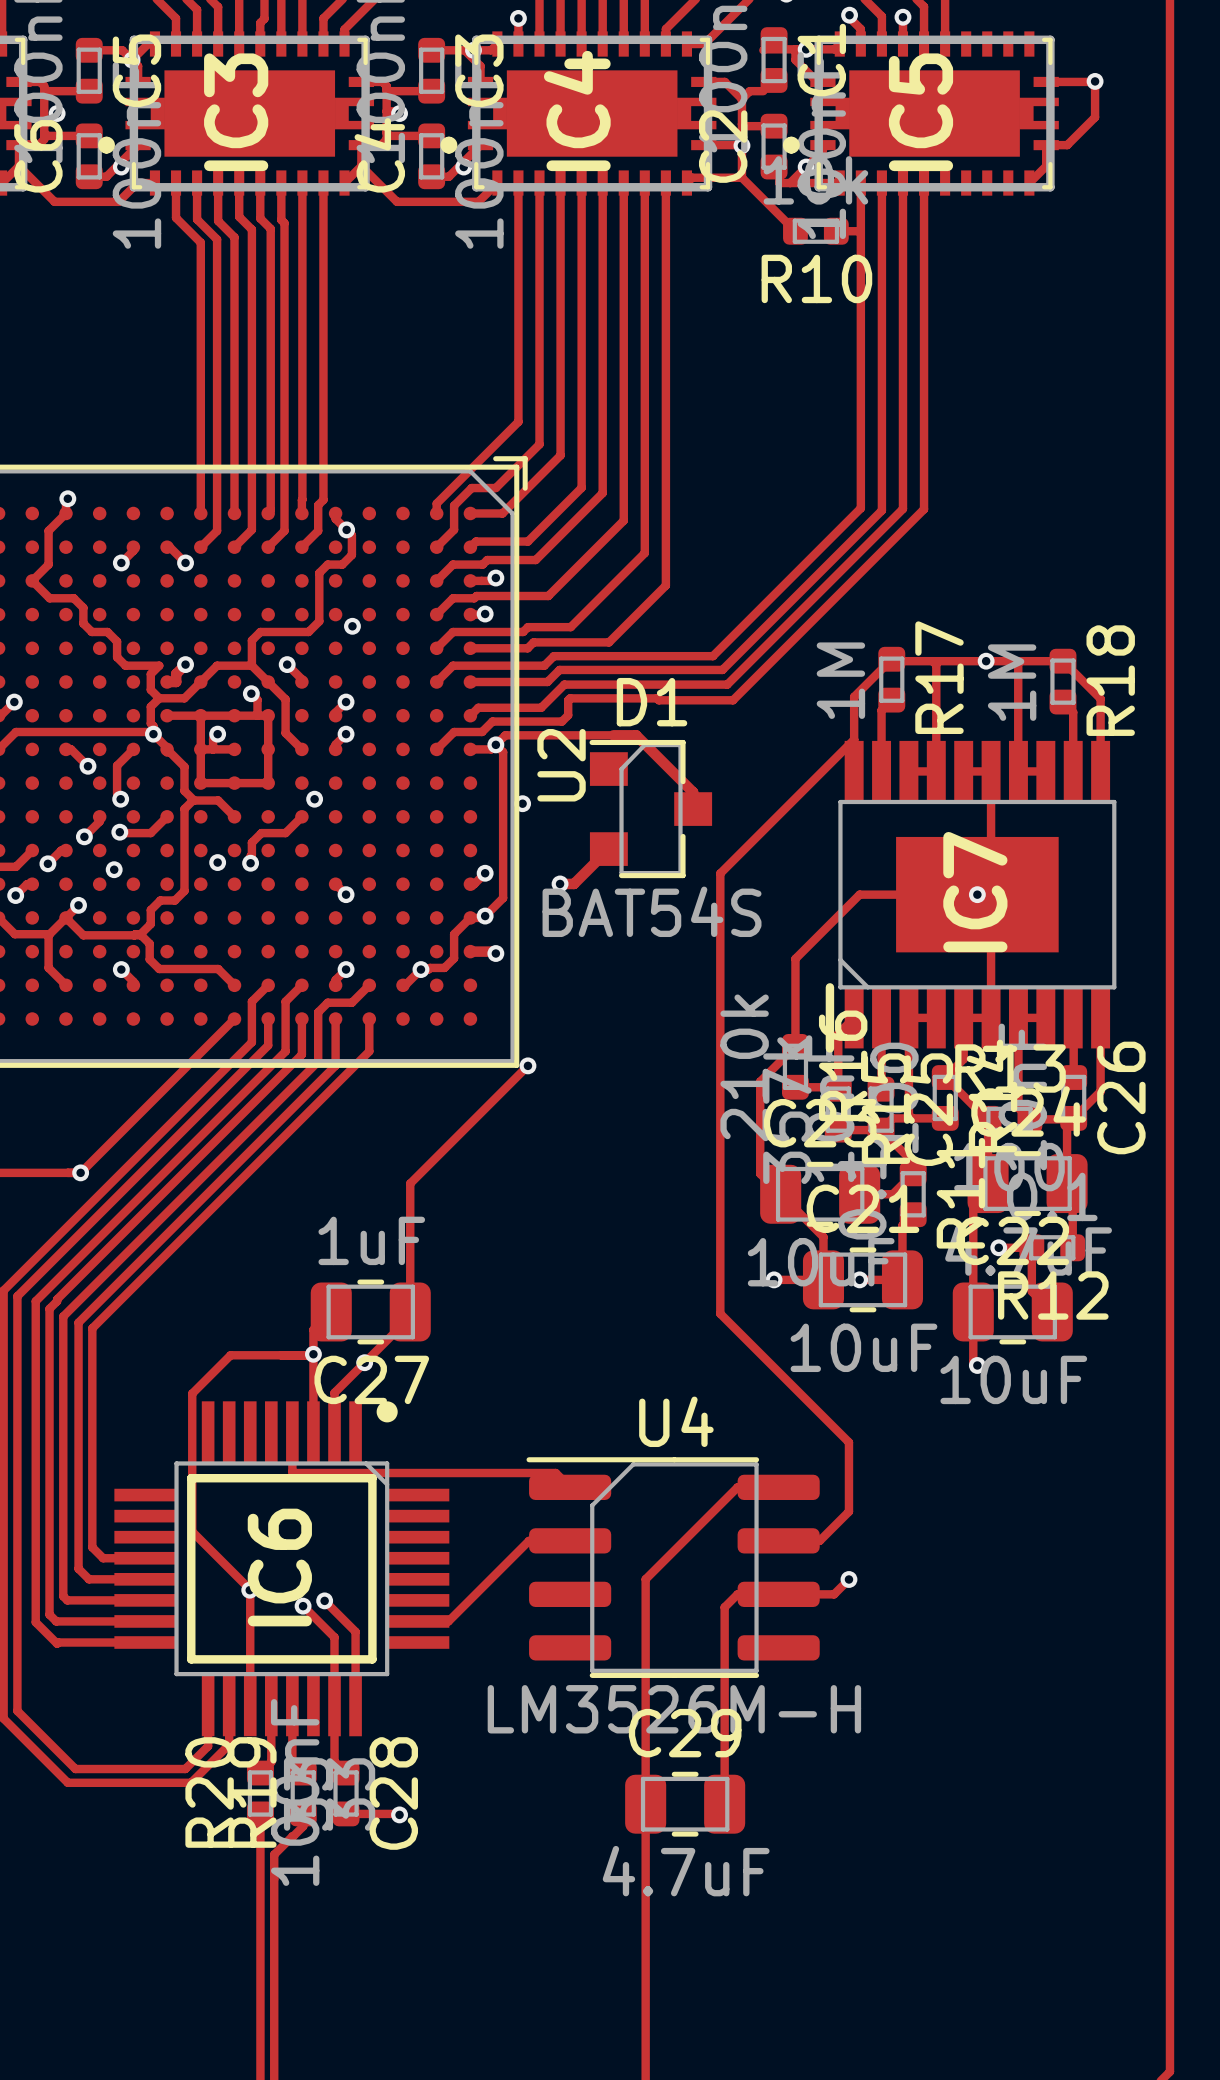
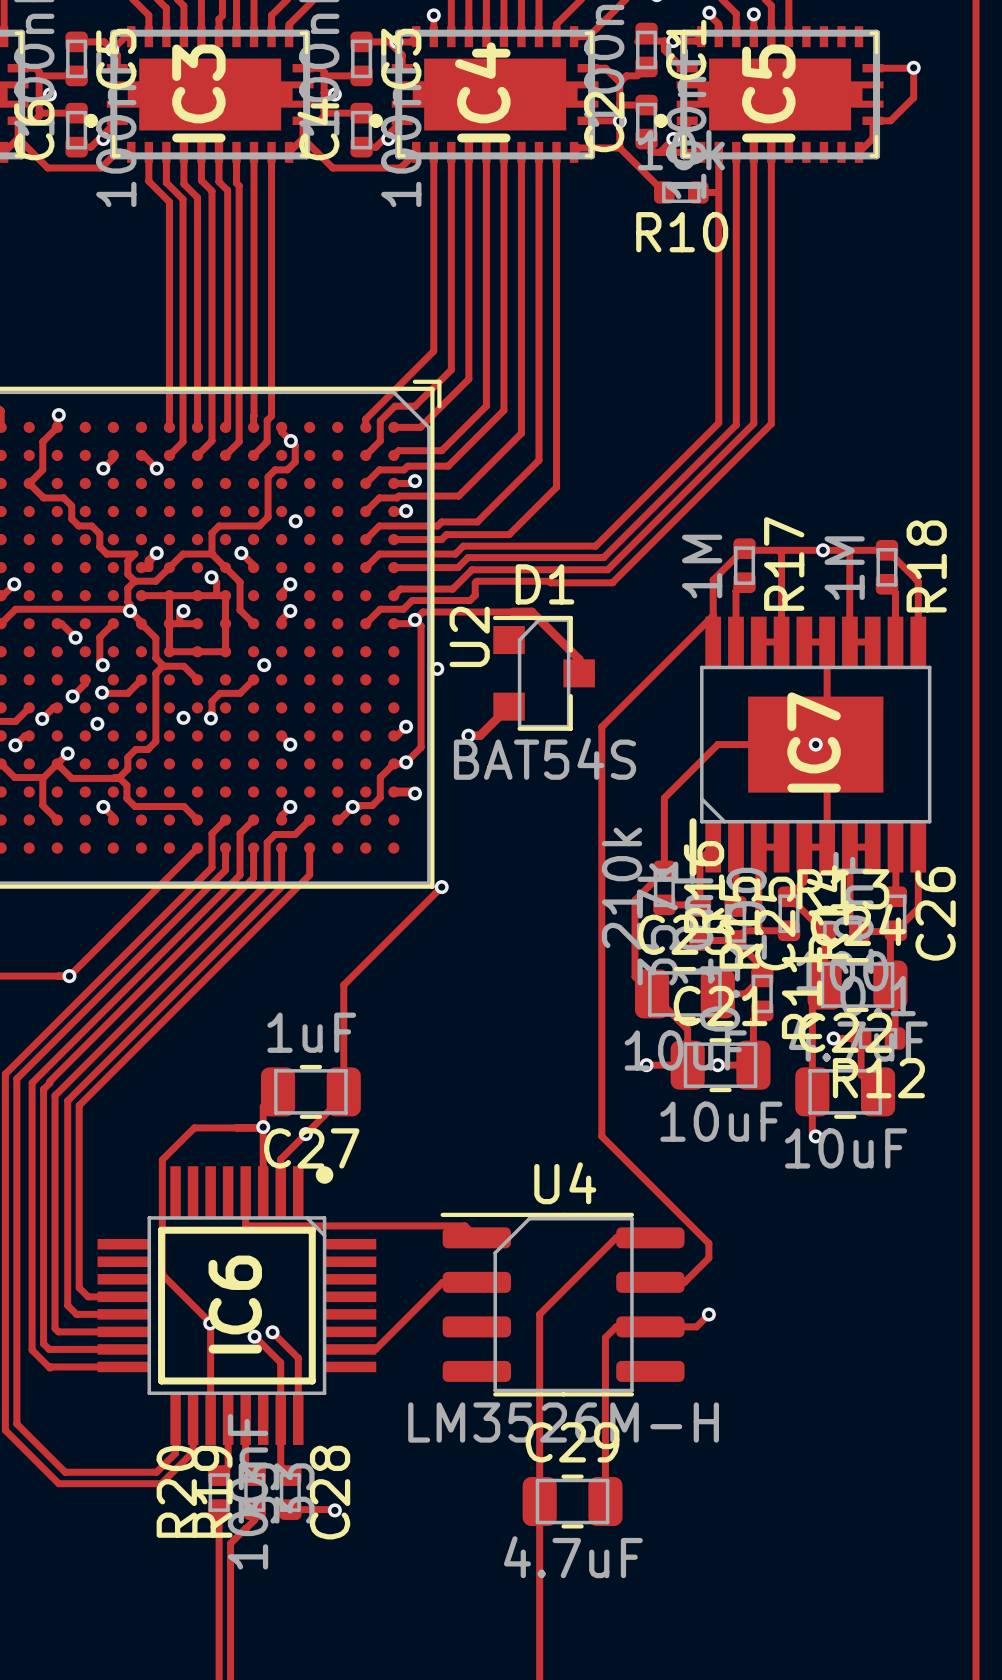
track: (720, 1313) (848, 1442) (848, 1494) -> (601, 1093) (601, 1136) (708, 1243)

